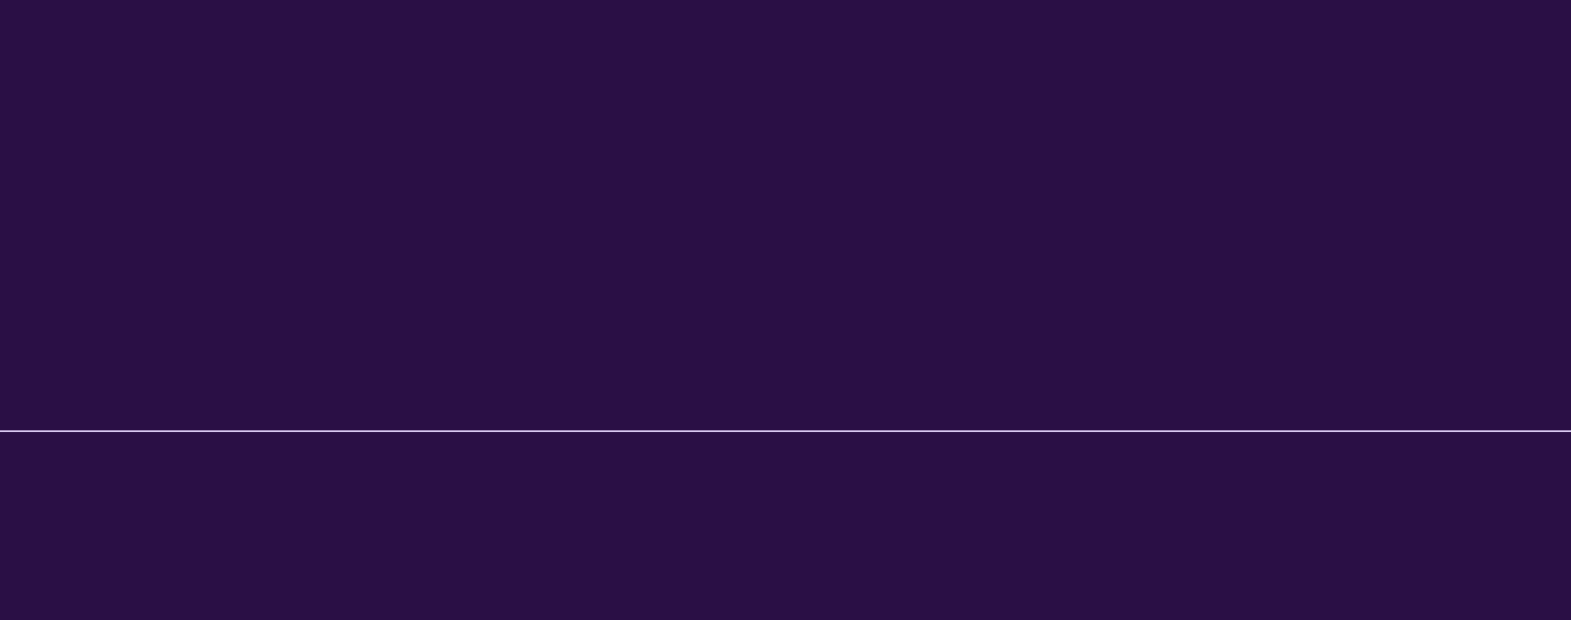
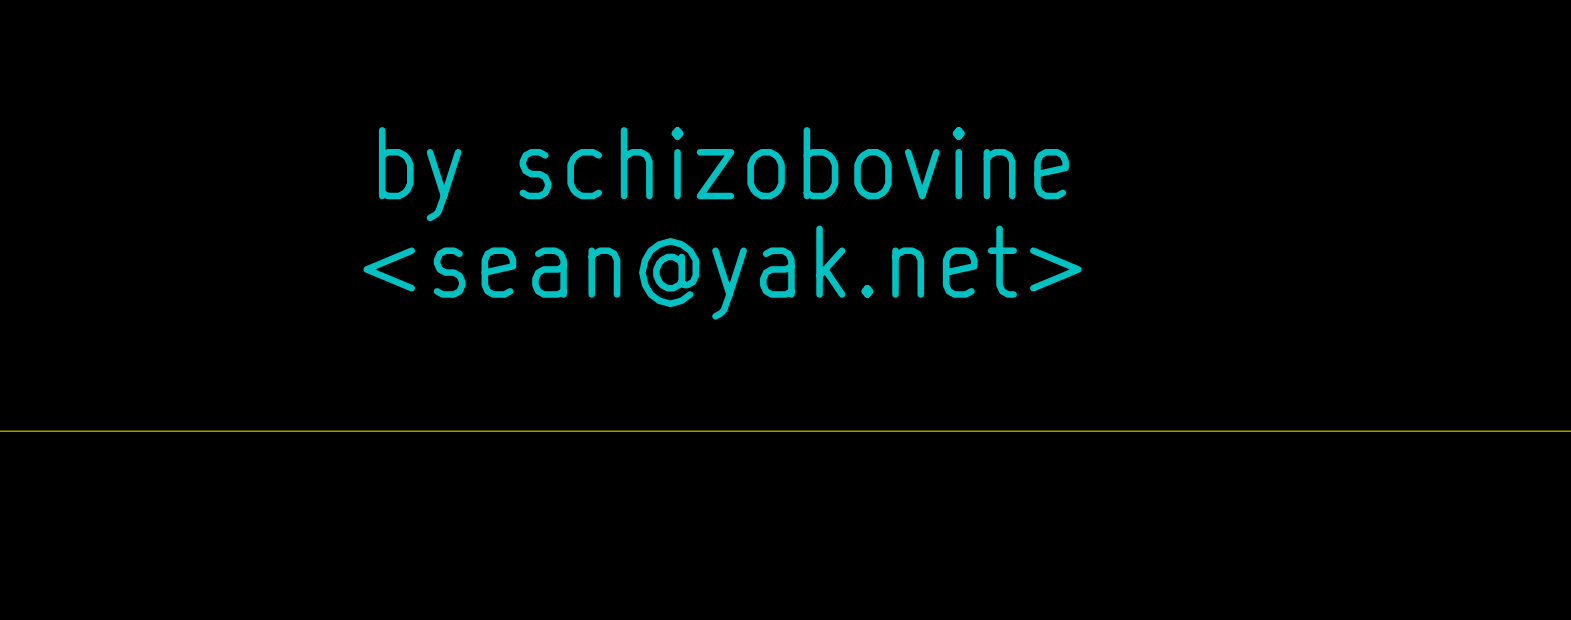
text: none -> by schizobovine (723, 174)
text: none -> <sean@yak.net> (722, 272)

